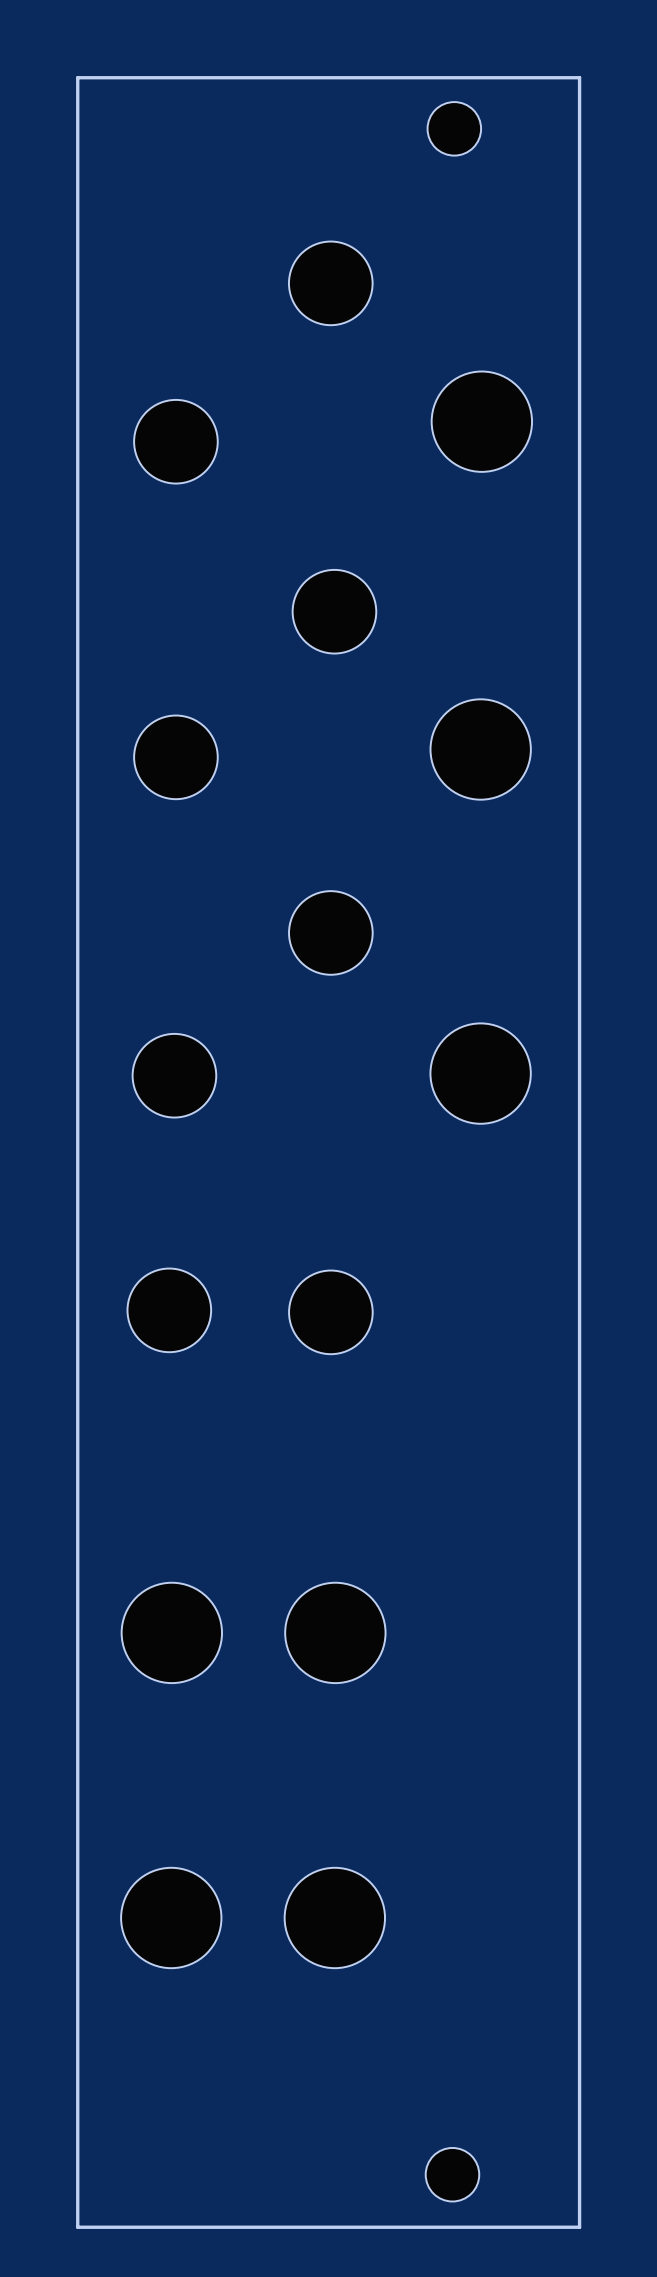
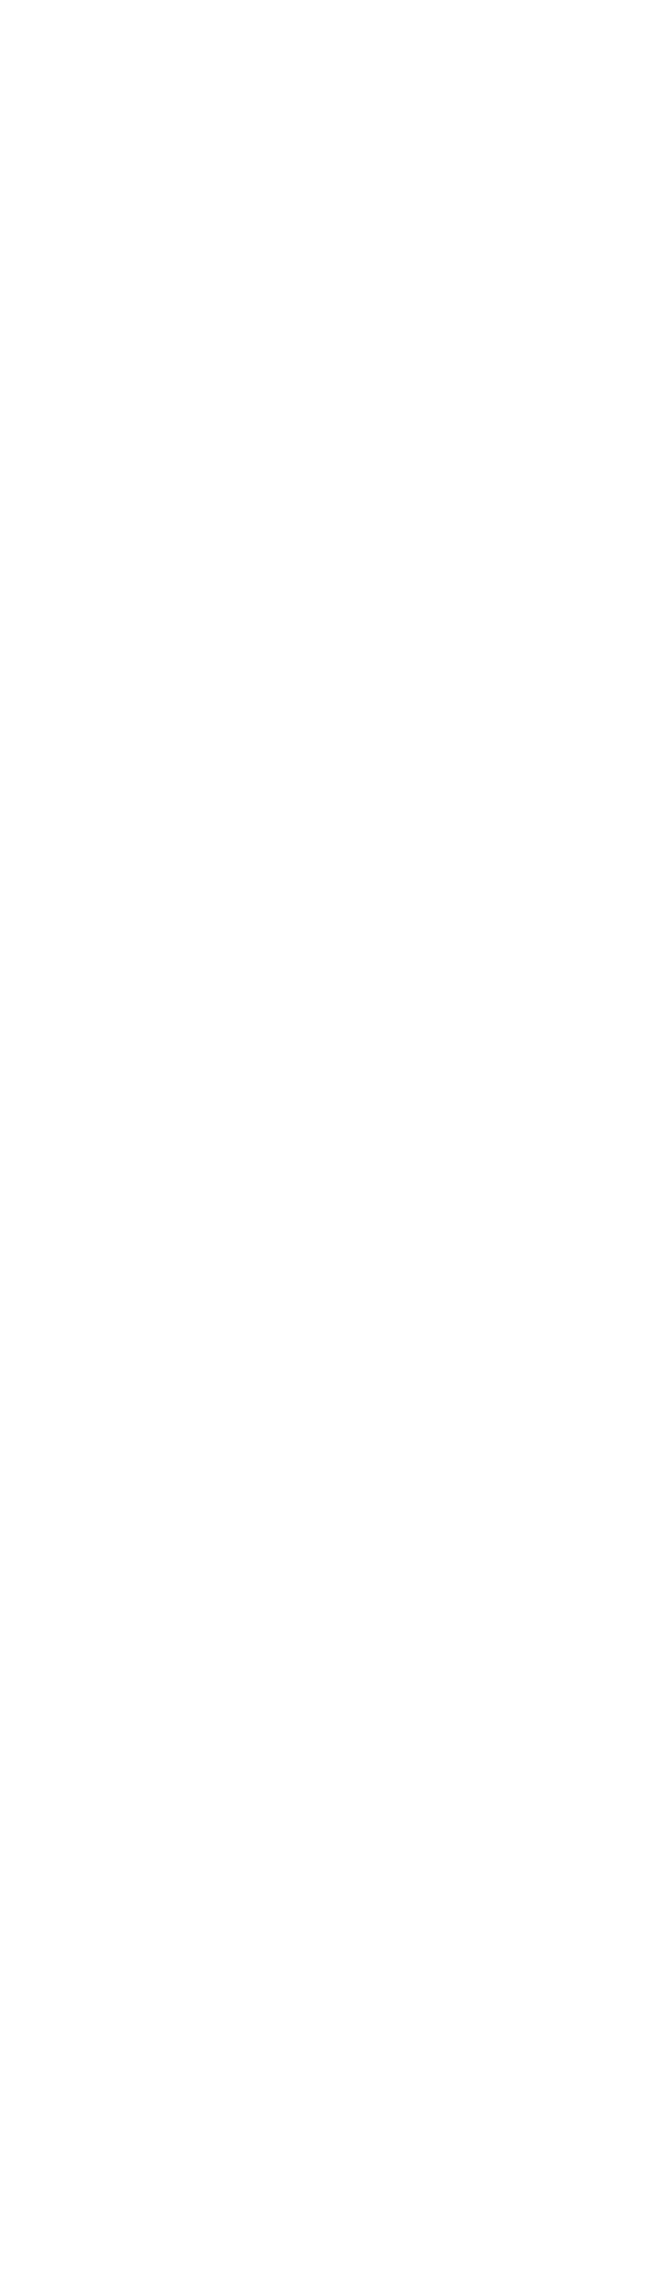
board edge: (579, 77) (77, 77) (77, 2227) (579, 2227) (579, 77) -> none
part: (454, 128) -> none
part: (330, 283) -> none
part: (481, 421) -> none
part: (175, 441) -> none
part: (334, 611) -> none
part: (480, 749) -> none
part: (175, 757) -> none
part: (330, 932) -> none
part: (480, 1073) -> none
part: (174, 1075) -> none
part: (169, 1310) -> none
part: (330, 1312) -> none
part: (171, 1632) -> none
part: (335, 1632) -> none
part: (171, 1917) -> none
part: (334, 1917) -> none
part: (452, 2174) -> none

